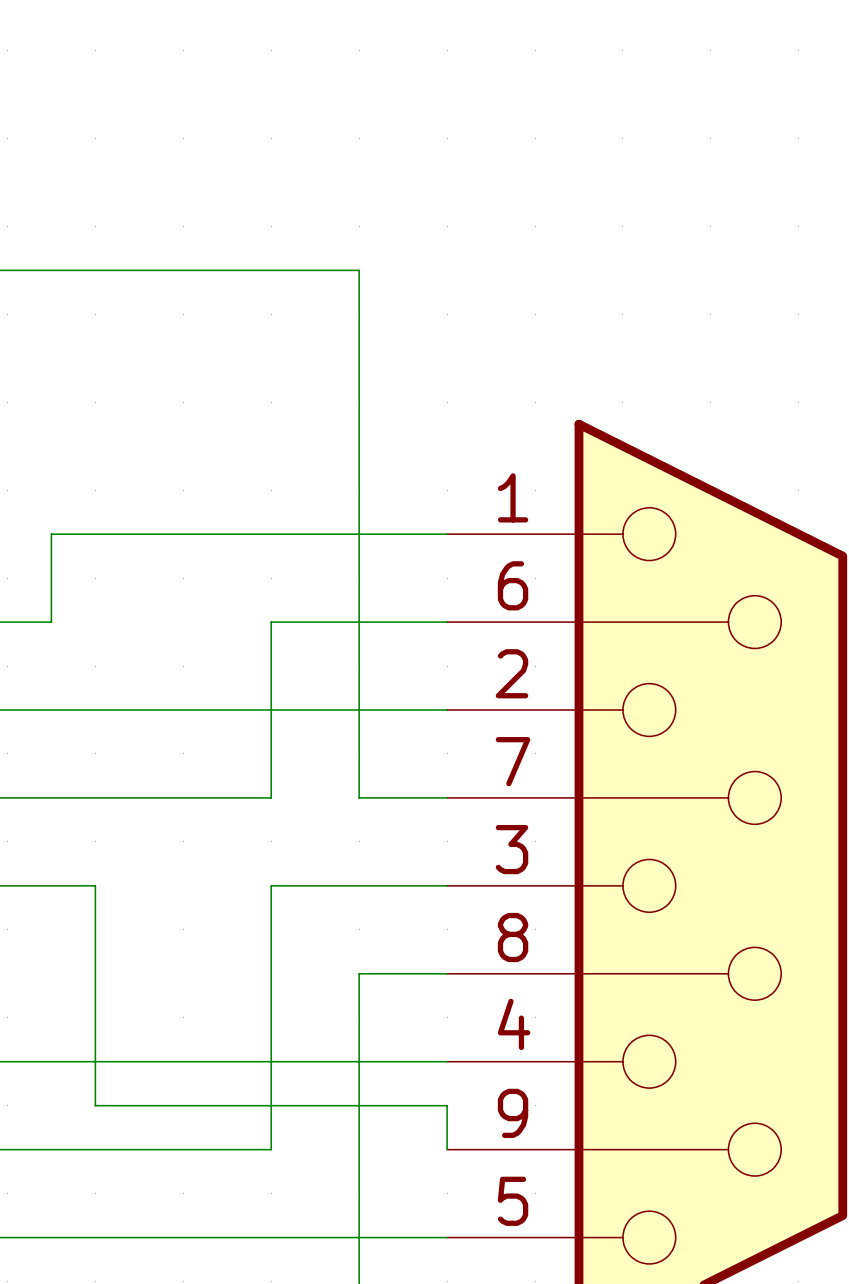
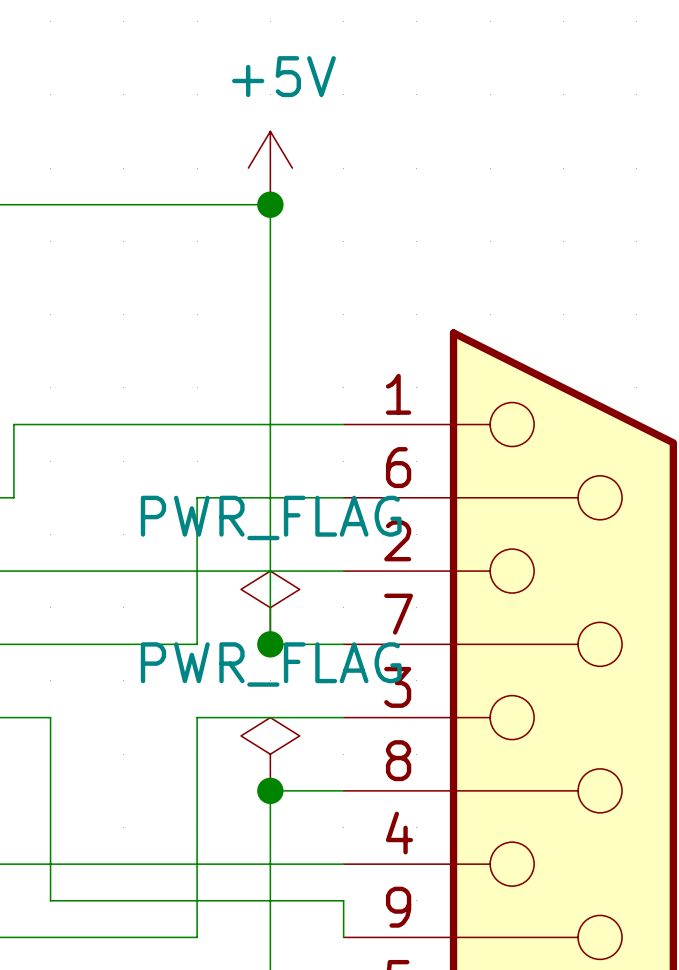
power symbol: none -> +5V (270, 168)
junction: none -> (270, 204)
power symbol: none -> PWR_FLAG (270, 607)
junction: none -> (270, 644)
power symbol: none -> PWR_FLAG (270, 754)
junction: none -> (270, 790)

